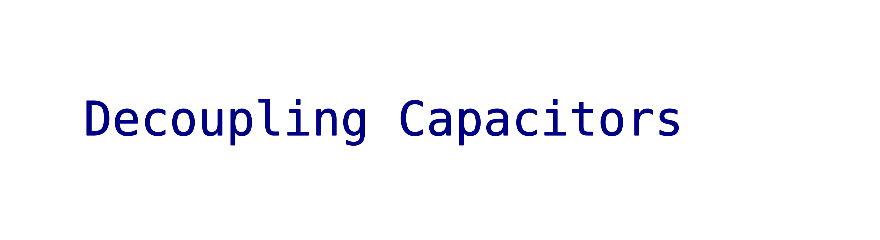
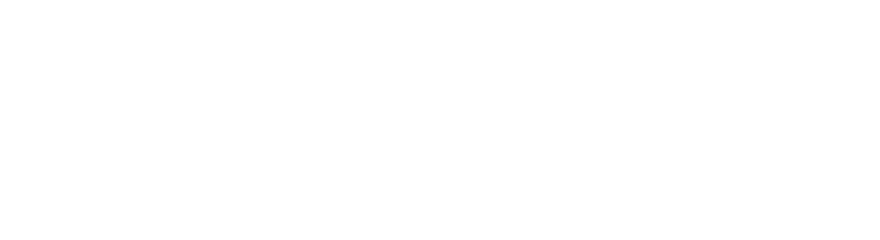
text: Decoupling Capacitors (382, 122) -> none

